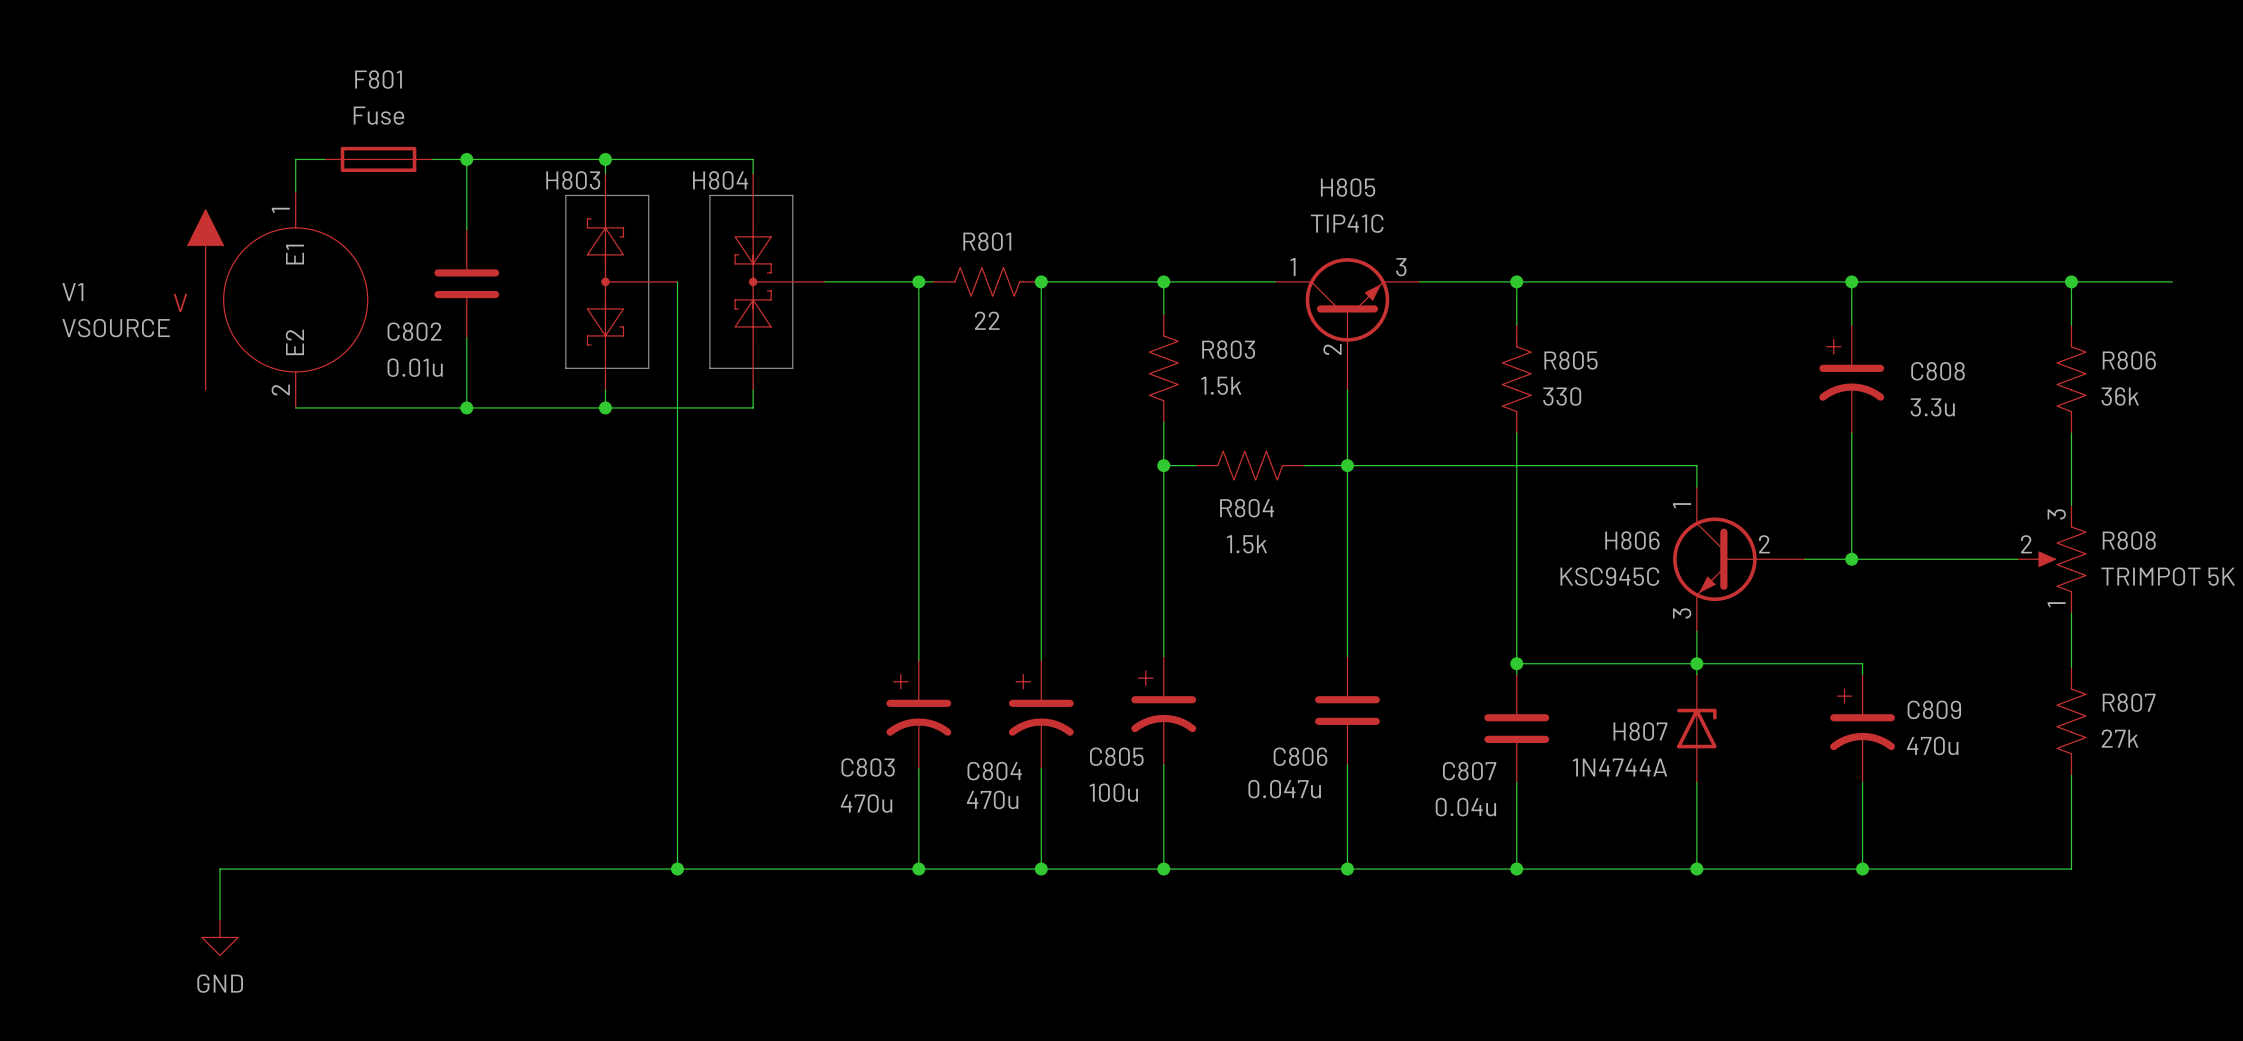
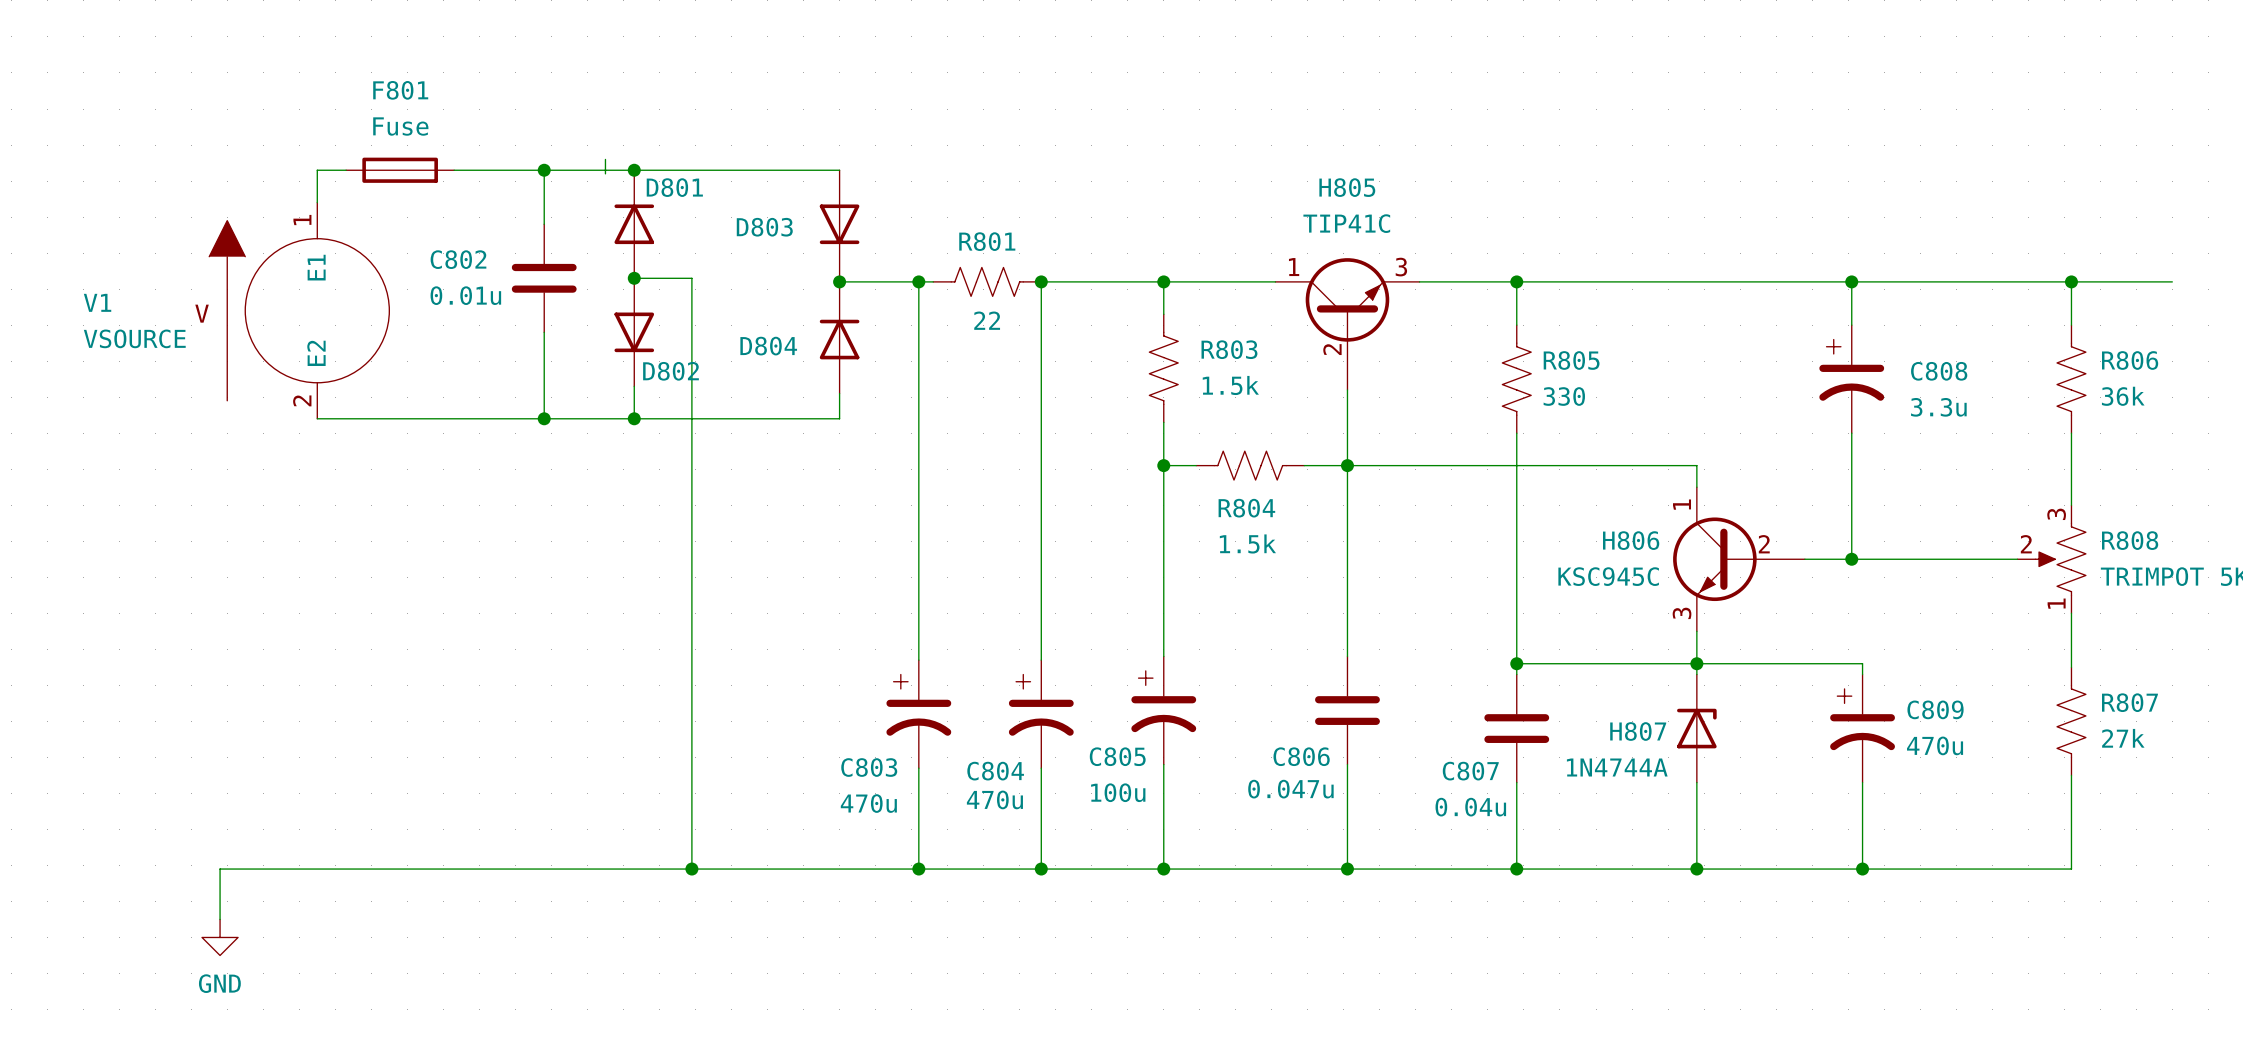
wire: (324, 159) (295, 159) (295, 191) -> (346, 170) (317, 170) (317, 202)
F801 position: (378, 159) -> (400, 170)
wire: (432, 159) (753, 159) (753, 173) -> none
wire: (466, 159) (466, 229) -> none
junction: (466, 159) -> none
junction position: (605, 159) -> (634, 170)
wire: none -> (454, 170) (839, 170)
wire: none -> (544, 170) (544, 224)
junction: none -> (544, 170)
line: (565, 195) (565, 368) (648, 368) (648, 195) (565, 195) -> none
line: (709, 195) (792, 195) (792, 368) (709, 368) (709, 195) -> none
D801: none -> (634, 224)
D803: none -> (839, 224)
wire: none -> (634, 278) (691, 278) (691, 869)
junction: none -> (634, 278)
H803: (632, 281) -> none
wire: (677, 281) (677, 869) -> none
H804: (780, 281) -> none
wire: (825, 281) (839, 281) -> none
junction: none -> (839, 281)
C802 position: (466, 283) -> (544, 278)
V1 position: (277, 299) -> (299, 310)
C802 name position: C802 (414, 331) -> C802 (458, 259)
wire: none -> (544, 332) (544, 418)
D802: none -> (634, 332)
wire: (466, 337) (466, 407) -> none
D804: none -> (839, 339)
C802 value position: 0.01u (415, 367) -> 0.01u (465, 295)
wire: none -> (634, 386) (634, 418)
wire: (605, 389) (605, 407) -> none
wire: (753, 389) (753, 407) (295, 407) -> none
wire: none -> (839, 393) (839, 418) (317, 418)
junction: (466, 407) -> none
junction position: (605, 407) -> (634, 418)
junction: none -> (544, 418)
junction position: (677, 869) -> (691, 869)

